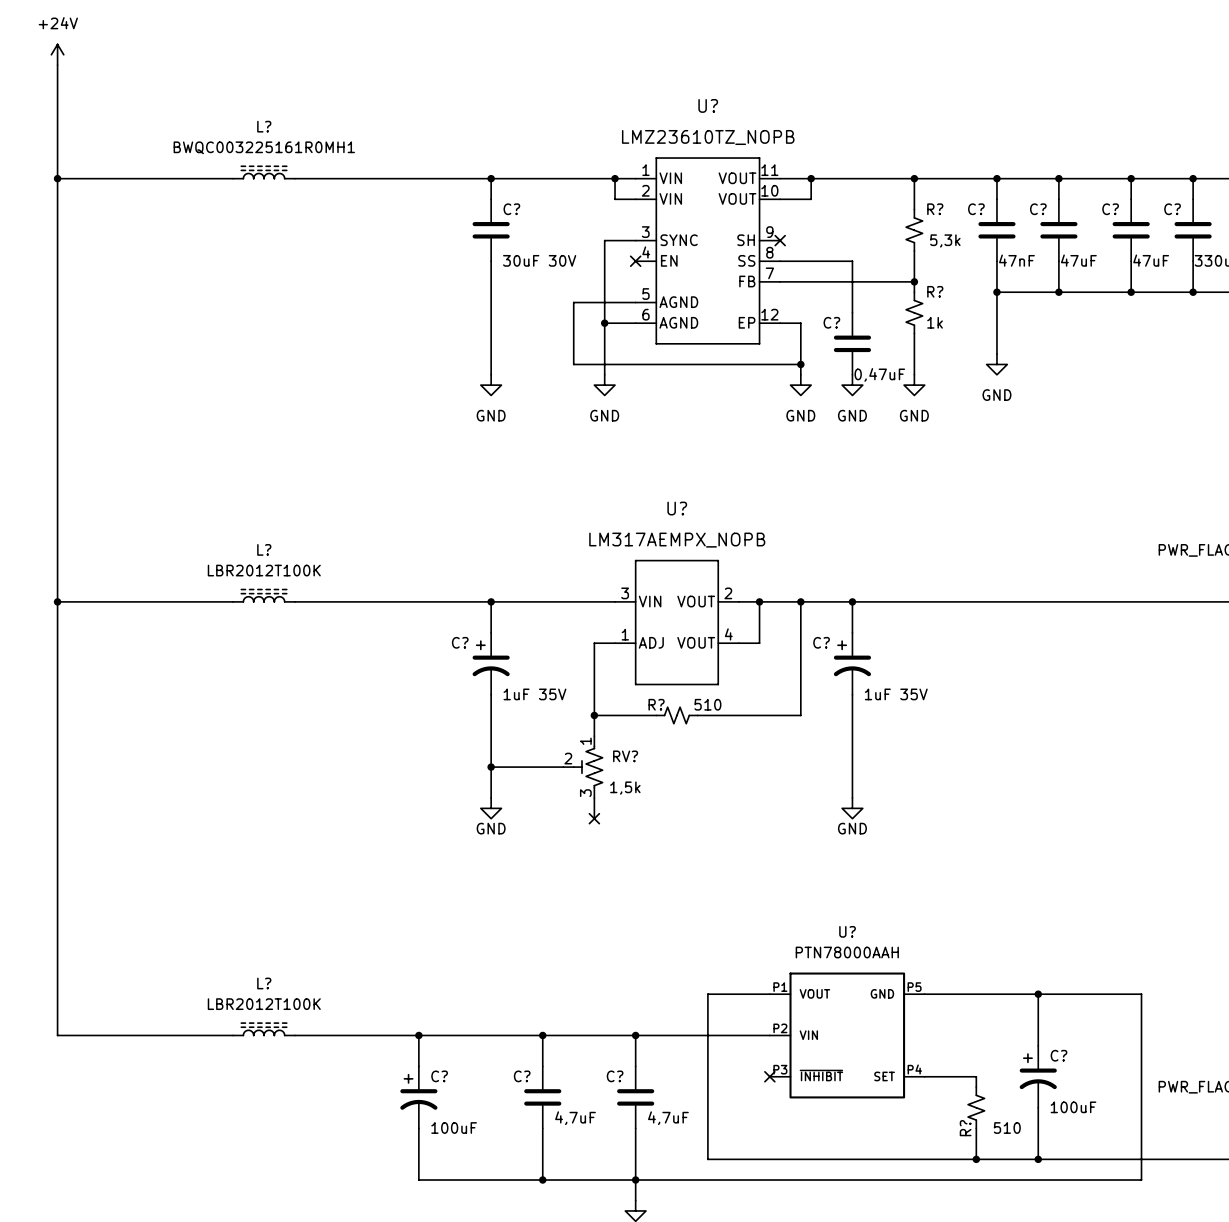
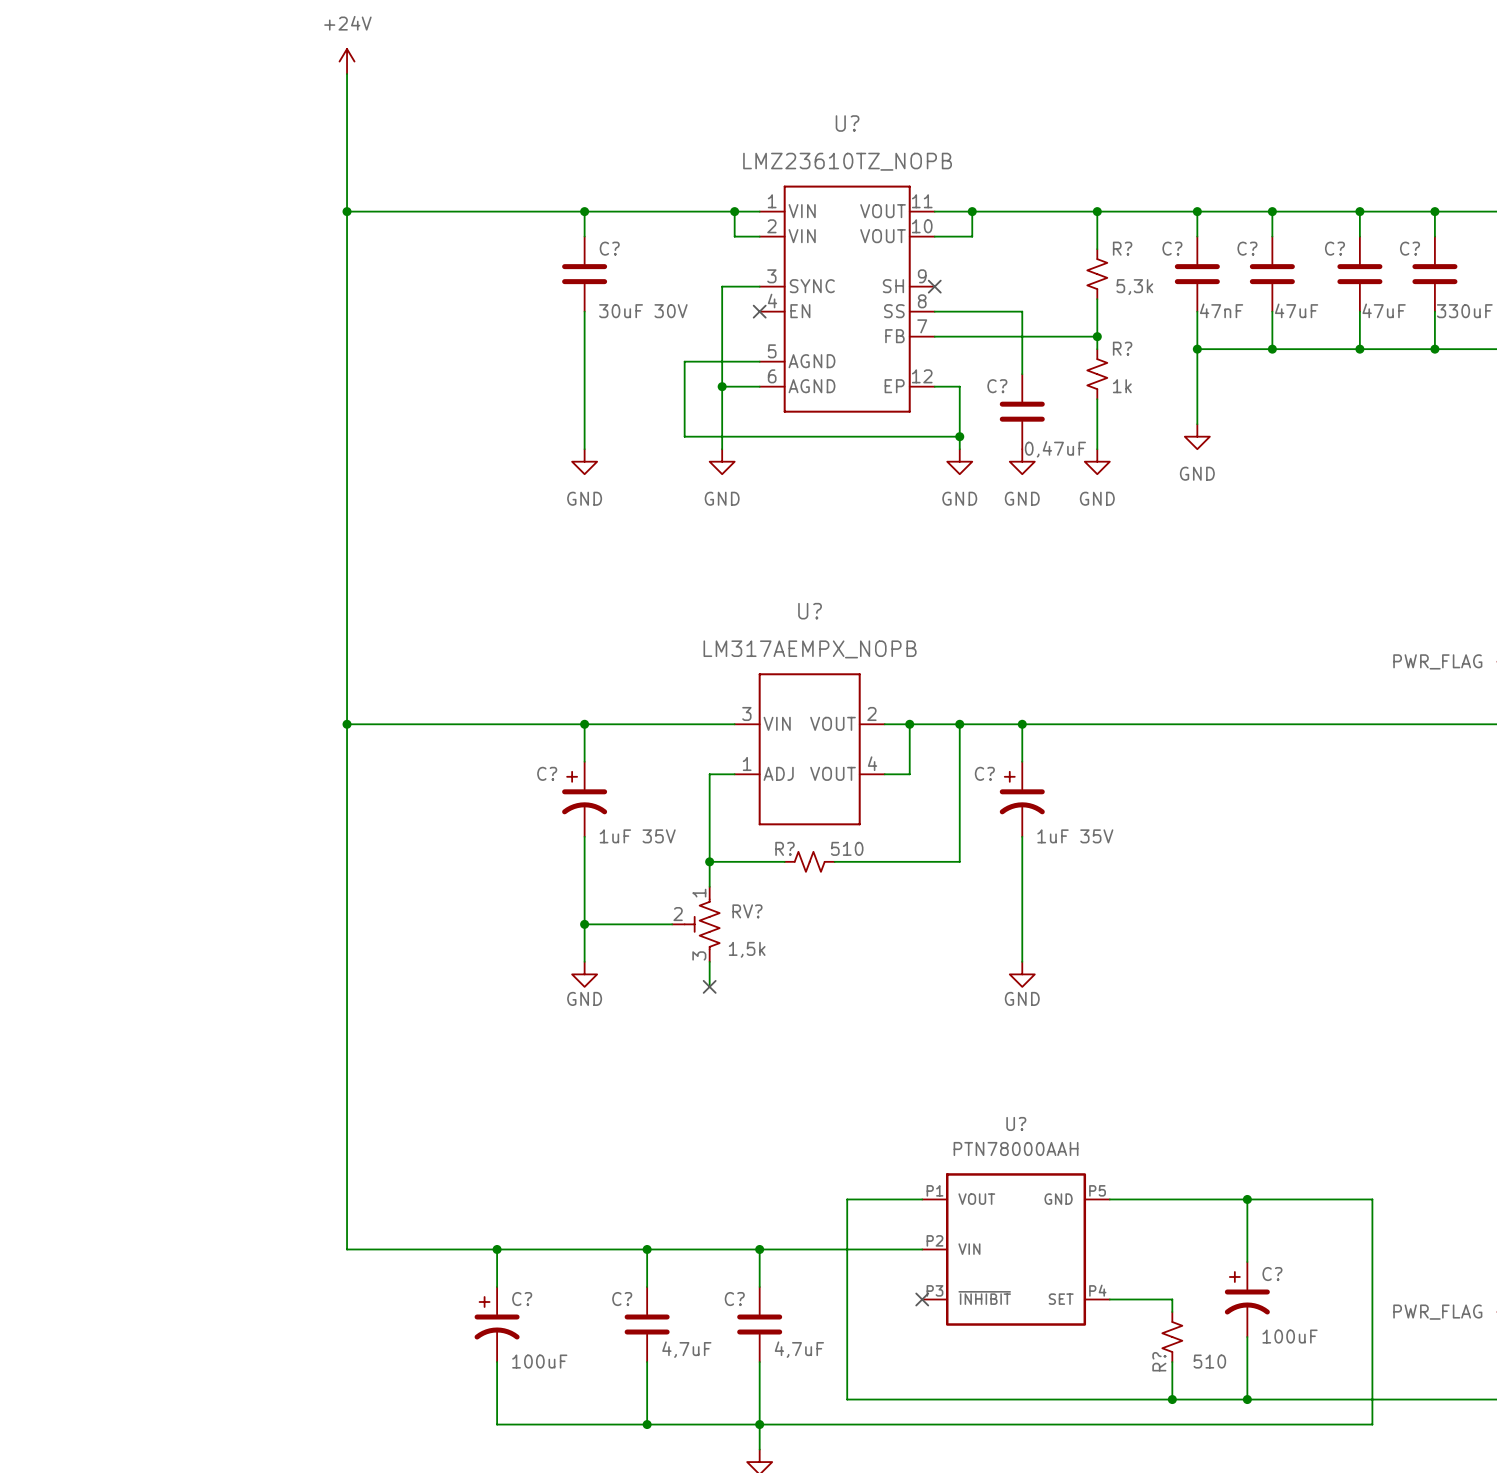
power symbol: +24V (57, 54) -> none
power symbol: none -> +24V (347, 61)
wire: (57, 65) (57, 1035) (233, 1035) -> none
wire: none -> (347, 74) (347, 1249)
L?: BWQC003225161R0MH1 (264, 172) -> none
wire: (57, 178) (233, 178) -> none
junction: (57, 178) -> none
junction: none -> (347, 211)
L?: LBR2012T100K (264, 595) -> none
wire: (57, 601) (233, 601) -> none
junction: (57, 601) -> none
junction: none -> (347, 724)
L?: LBR2012T100K (264, 1029) -> none

